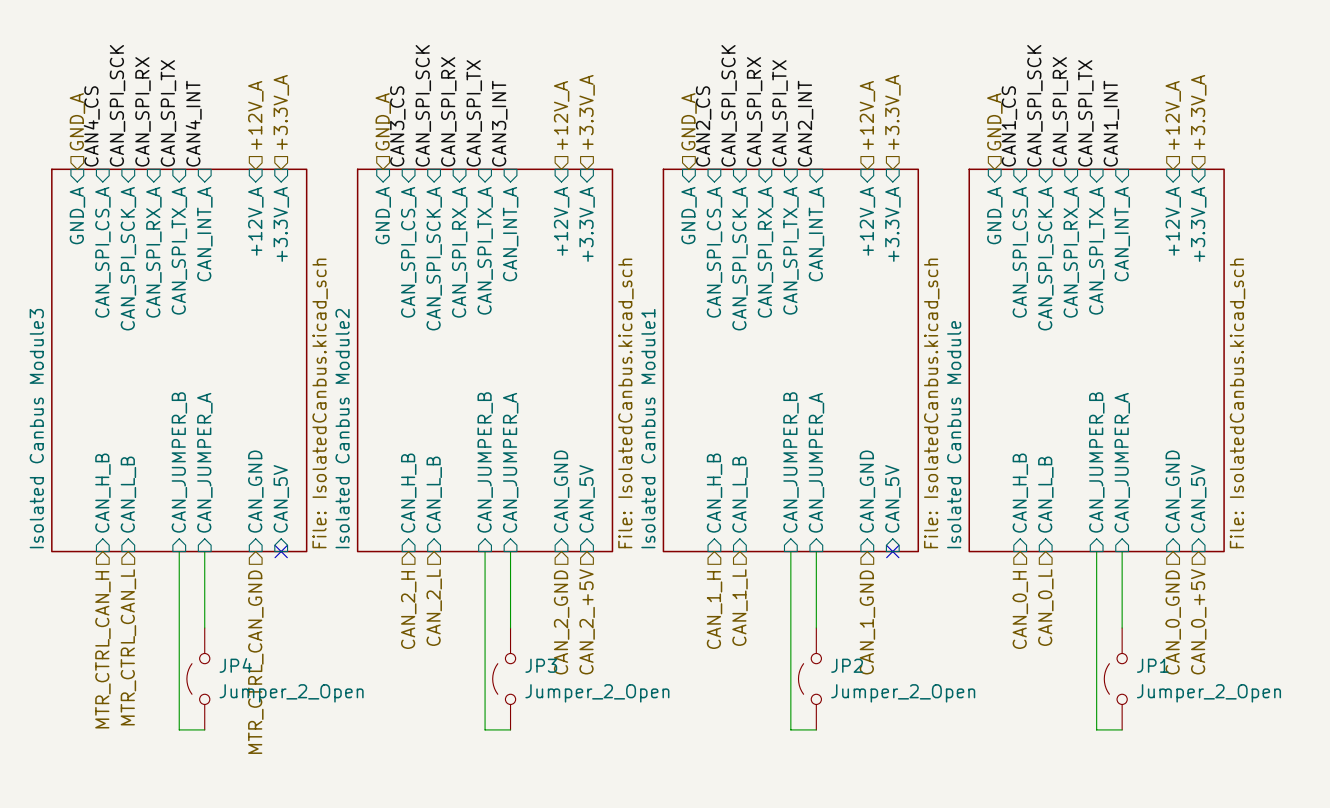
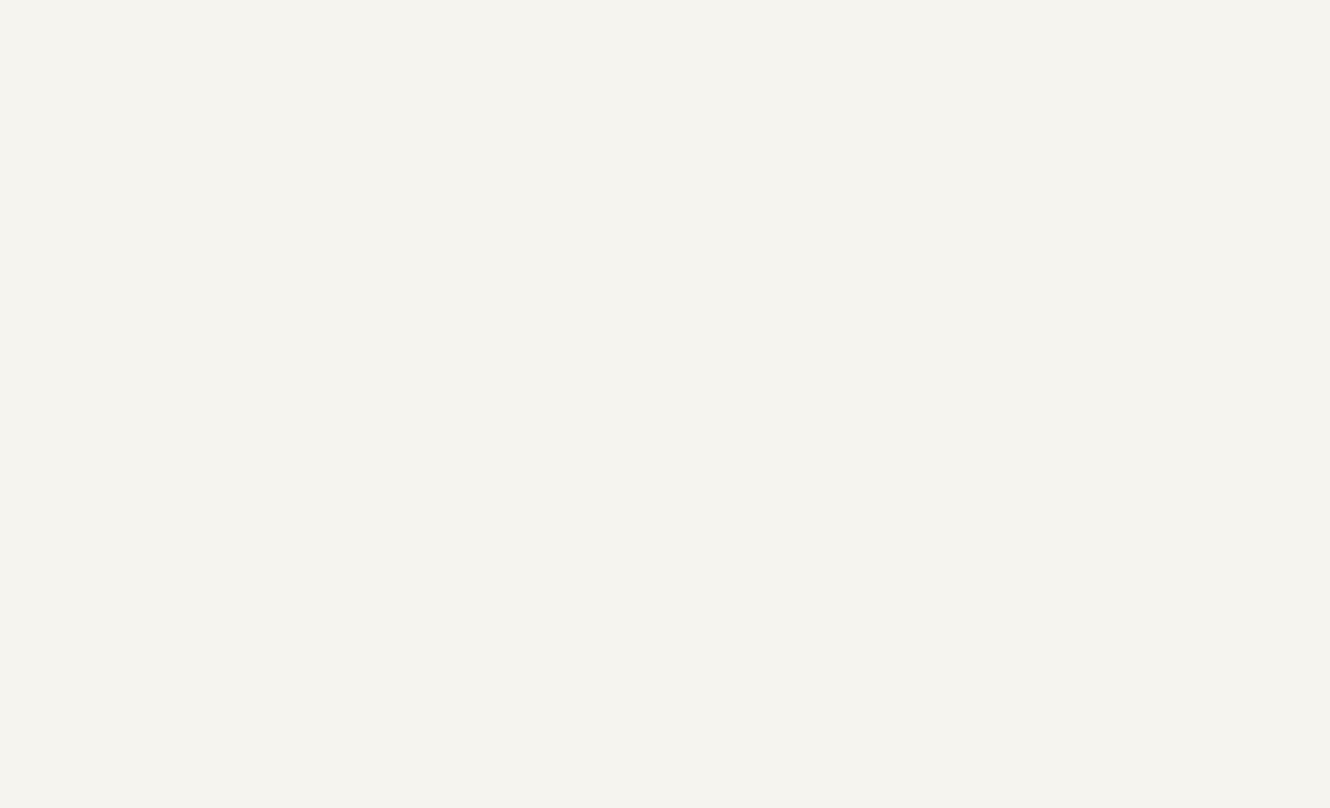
label: CAN_SPI_SCK (117, 105) -> none
label: CAN_SPI_SCK (423, 105) -> none
label: CAN_SPI_SCK (729, 105) -> none
label: CAN_SPI_SCK (1034, 105) -> none
label: CAN_SPI_RX (143, 111) -> none
label: CAN_SPI_RX (448, 111) -> none
label: CAN_SPI_RX (754, 111) -> none
label: CAN_SPI_RX (1060, 111) -> none
hierarchical label: +3.3V_A (281, 112) -> none
hierarchical label: +3.3V_A (587, 112) -> none
hierarchical label: +3.3V_A (892, 112) -> none
hierarchical label: +3.3V_A (1198, 112) -> none
label: CAN_SPI_TX (168, 113) -> none
label: CAN_SPI_TX (474, 113) -> none
label: CAN_SPI_TX (780, 113) -> none
label: CAN_SPI_TX (1085, 113) -> none
hierarchical label: +12V_A (255, 115) -> none
hierarchical label: +12V_A (561, 115) -> none
hierarchical label: +12V_A (867, 115) -> none
hierarchical label: +12V_A (1173, 115) -> none
hierarchical label: GND_A (77, 121) -> none
hierarchical label: GND_A (383, 121) -> none
hierarchical label: GND_A (689, 121) -> none
hierarchical label: GND_A (994, 121) -> none
label: CAN4_INT (193, 123) -> none
label: CAN3_INT (499, 123) -> none
label: CAN2_INT (805, 123) -> none
label: CAN1_INT (1111, 123) -> none
label: CAN4_CS (91, 126) -> none
label: CAN3_CS (397, 126) -> none
label: CAN2_CS (703, 126) -> none
label: CAN1_CS (1009, 126) -> none
sheet pin: GND_A (77, 215) -> none
sheet pin: GND_A (383, 215) -> none
sheet pin: GND_A (689, 215) -> none
sheet pin: GND_A (994, 215) -> none
sheet pin: +12V_A (255, 221) -> none
sheet pin: +12V_A (561, 221) -> none
sheet pin: +12V_A (867, 221) -> none
sheet pin: +12V_A (1173, 221) -> none
sheet pin: +3.3V_A (281, 224) -> none
sheet pin: +3.3V_A (587, 224) -> none
sheet pin: +3.3V_A (892, 224) -> none
sheet pin: +3.3V_A (1198, 224) -> none
sheet pin: CAN_INT_A (204, 234) -> none
sheet pin: CAN_INT_A (510, 234) -> none
sheet pin: CAN_INT_A (816, 234) -> none
sheet pin: CAN_INT_A (1122, 234) -> none
sheet pin: CAN_SPI_TX_A (179, 250) -> none
sheet pin: CAN_SPI_TX_A (485, 250) -> none
sheet pin: CAN_SPI_TX_A (790, 250) -> none
sheet pin: CAN_SPI_TX_A (1096, 250) -> none
sheet pin: CAN_SPI_CS_A (102, 252) -> none
sheet pin: CAN_SPI_RX_A (153, 252) -> none
sheet pin: CAN_SPI_CS_A (408, 252) -> none
sheet pin: CAN_SPI_RX_A (459, 252) -> none
sheet pin: CAN_SPI_CS_A (714, 252) -> none
sheet pin: CAN_SPI_RX_A (765, 252) -> none
sheet pin: CAN_SPI_CS_A (1020, 252) -> none
sheet pin: CAN_SPI_RX_A (1071, 252) -> none
sheet pin: CAN_SPI_SCK_A (128, 258) -> none
sheet pin: CAN_SPI_SCK_A (434, 258) -> none
sheet pin: CAN_SPI_SCK_A (740, 258) -> none
sheet pin: CAN_SPI_SCK_A (1045, 258) -> none
sheet Isolated Canbus Module3: File: IsolatedCanbus.kicad_sch (179, 360) -> none
sheet Isolated Canbus Module2: File: IsolatedCanbus.kicad_sch (485, 360) -> none
sheet Isolated Canbus Module1: File: IsolatedCanbus.kicad_sch (790, 360) -> none
sheet Isolated Canbus Module: File: IsolatedCanbus.kicad_sch (1096, 360) -> none
sheet pin: CAN_JUMPER_B (179, 462) -> none
sheet pin: CAN_JUMPER_A (204, 462) -> none
sheet pin: CAN_JUMPER_B (485, 462) -> none
sheet pin: CAN_JUMPER_A (510, 462) -> none
sheet pin: CAN_JUMPER_B (790, 462) -> none
sheet pin: CAN_JUMPER_A (816, 462) -> none
sheet pin: CAN_JUMPER_B (1096, 462) -> none
sheet pin: CAN_JUMPER_A (1122, 462) -> none
sheet pin: CAN_GND (255, 491) -> none
sheet pin: CAN_GND (561, 491) -> none
sheet pin: CAN_GND (867, 491) -> none
sheet pin: CAN_GND (1173, 491) -> none
sheet pin: CAN_H_B (102, 493) -> none
sheet pin: CAN_H_B (408, 493) -> none
sheet pin: CAN_H_B (714, 493) -> none
sheet pin: CAN_H_B (1020, 493) -> none
sheet pin: CAN_L_B (128, 494) -> none
sheet pin: CAN_L_B (434, 494) -> none
sheet pin: CAN_L_B (740, 494) -> none
sheet pin: CAN_L_B (1045, 494) -> none
sheet pin: CAN_5V (281, 498) -> none
sheet pin: CAN_5V (587, 498) -> none
sheet pin: CAN_5V (892, 498) -> none
sheet pin: CAN_5V (1198, 498) -> none
wire: (179, 551) (179, 729) (204, 729) -> none
wire: (204, 551) (204, 628) -> none
no-connect mark: (281, 551) -> none
wire: (485, 551) (485, 729) (510, 729) -> none
wire: (510, 551) (510, 628) -> none
wire: (790, 551) (790, 729) (816, 729) -> none
wire: (816, 551) (816, 628) -> none
no-connect mark: (892, 551) -> none
wire: (1096, 551) (1096, 729) (1122, 729) -> none
wire: (1122, 551) (1122, 628) -> none
hierarchical label: CAN_2_L (434, 607) -> none
hierarchical label: CAN_1_L (740, 607) -> none
hierarchical label: CAN_0_L (1045, 607) -> none
hierarchical label: CAN_2_H (408, 610) -> none
hierarchical label: CAN_1_H (714, 610) -> none
hierarchical label: CAN_0_H (1020, 610) -> none
hierarchical label: CAN_2_+5V (587, 621) -> none
hierarchical label: CAN_0_+5V (1198, 621) -> none
hierarchical label: CAN_2_GND (561, 622) -> none
hierarchical label: CAN_1_GND (867, 622) -> none
hierarchical label: CAN_0_GND (1173, 622) -> none
hierarchical label: MTR_CTRL_CAN_L (128, 647) -> none
hierarchical label: MTR_CTRL_CAN_H (102, 649) -> none
hierarchical label: MTR_CTRL_CAN_GND (255, 662) -> none
JP4: Jumper_2_Open (198, 678) -> none
JP3: Jumper_2_Open (504, 678) -> none
JP2: Jumper_2_Open (809, 678) -> none
JP1: Jumper_2_Open (1115, 678) -> none

